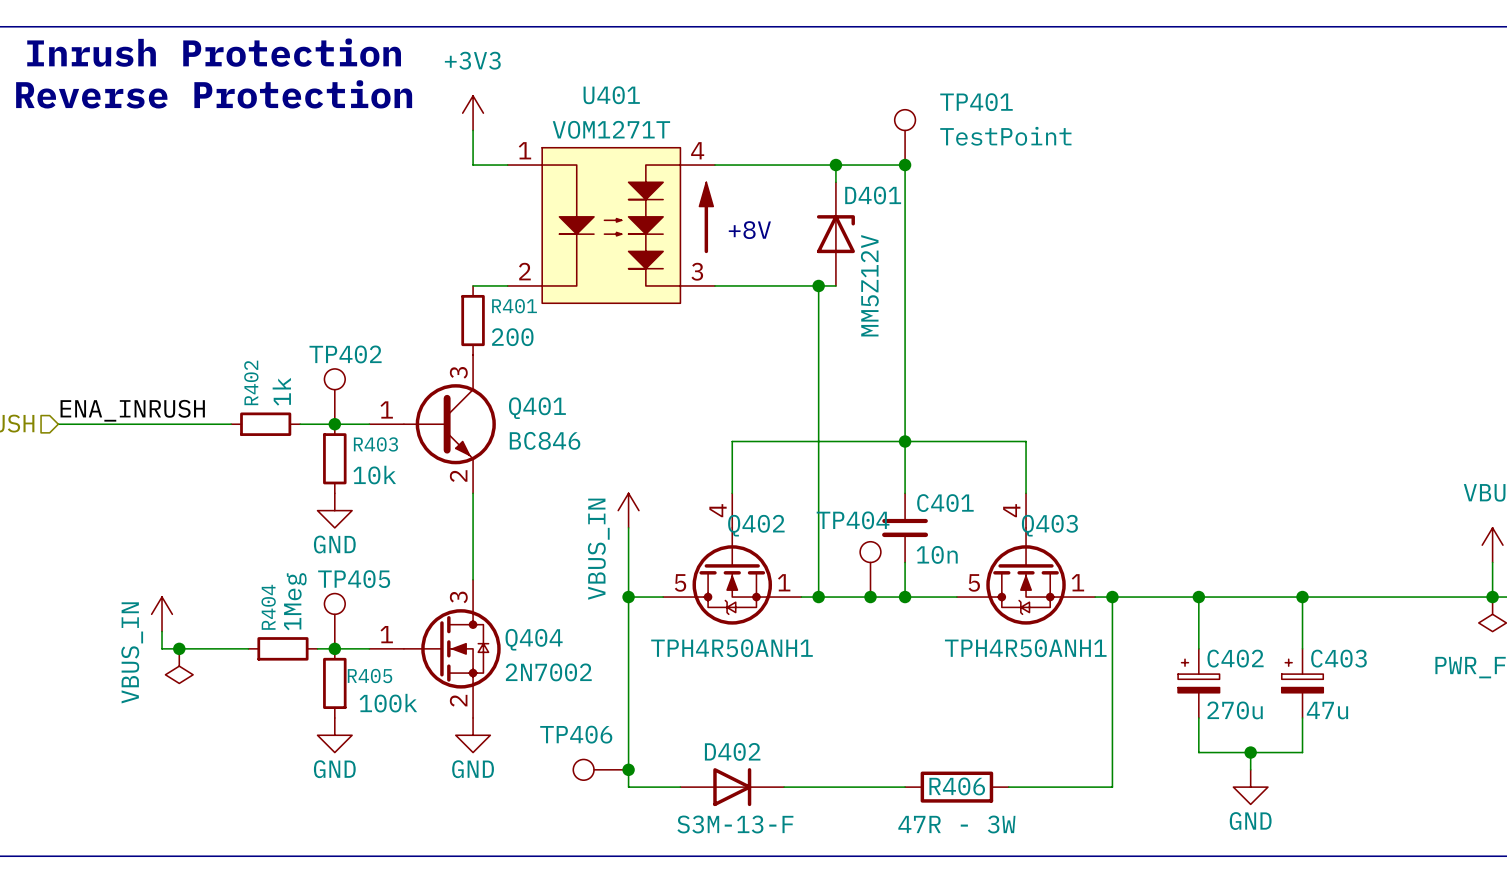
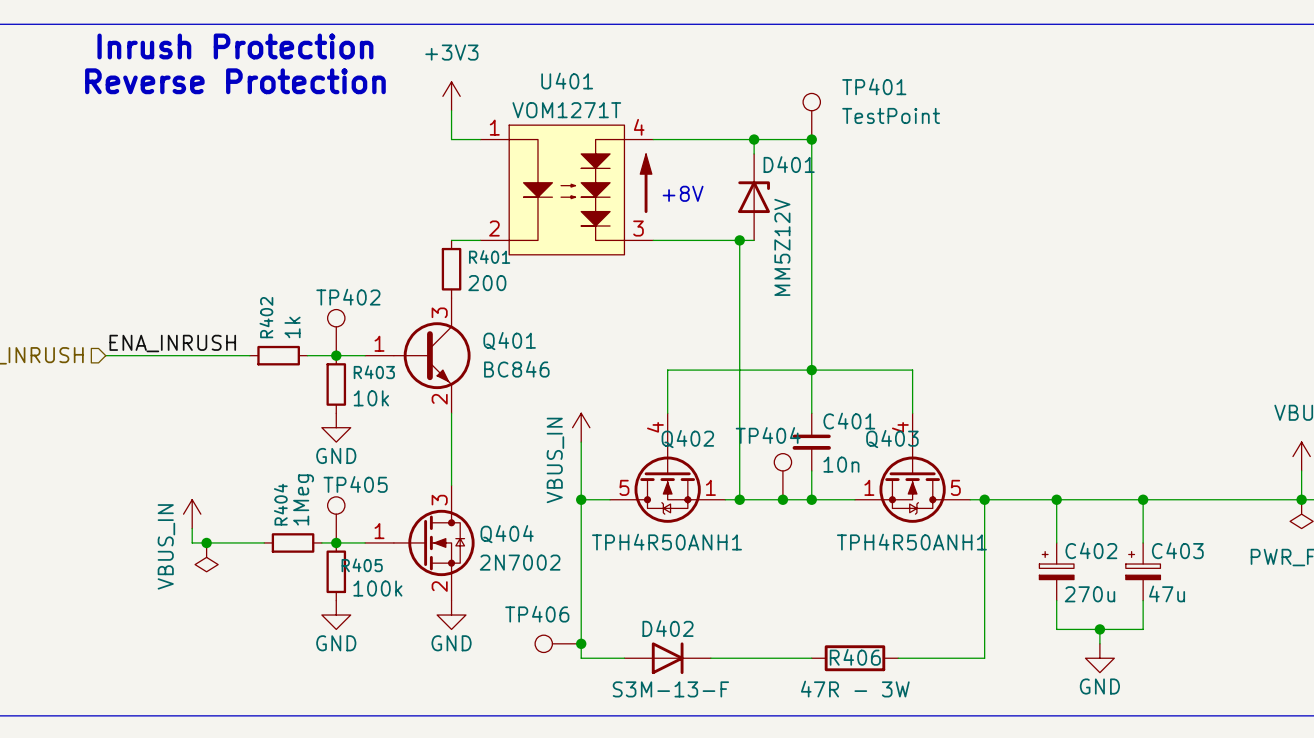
Q403 flip: as is (1026, 576) -> left-right (912, 482)

